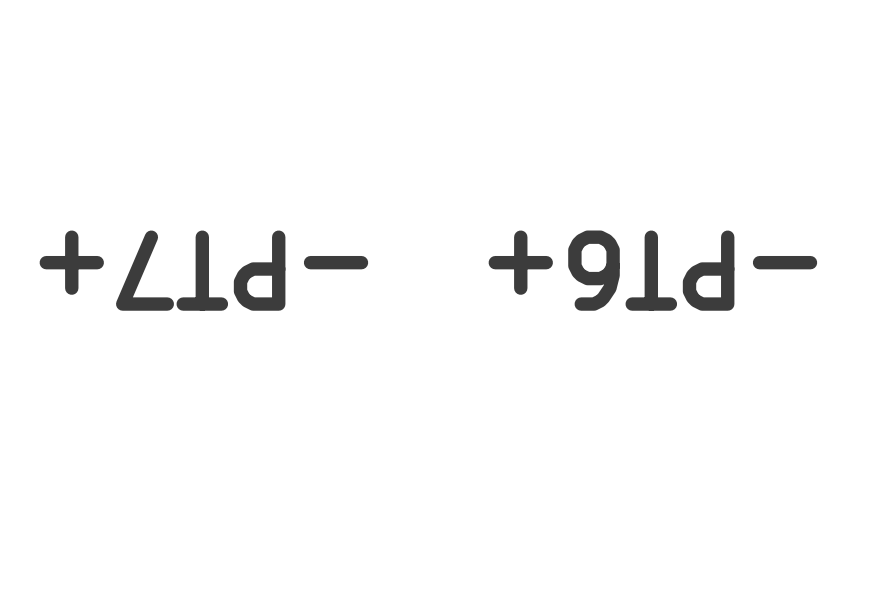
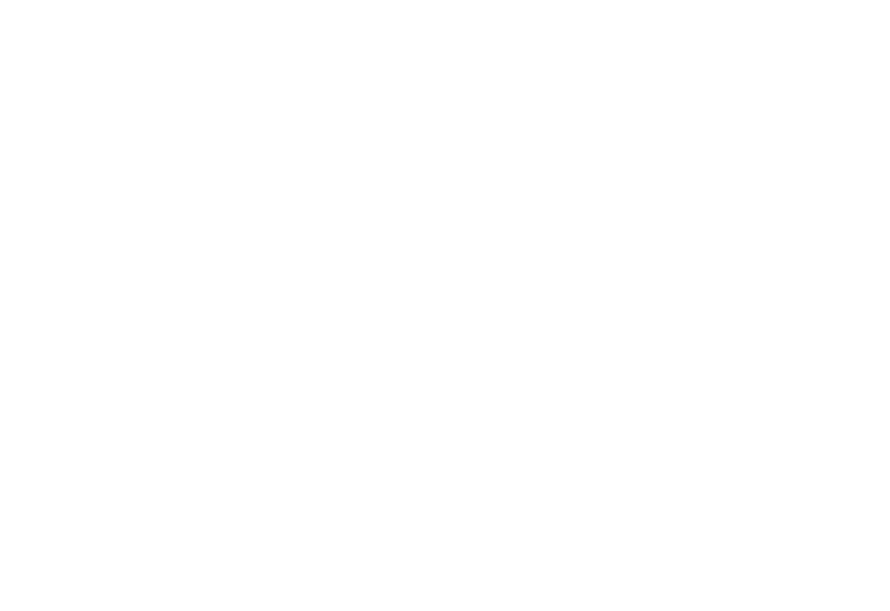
text: -PT7+ (203, 270) -> none
text: -PT6+ (652, 270) -> none

